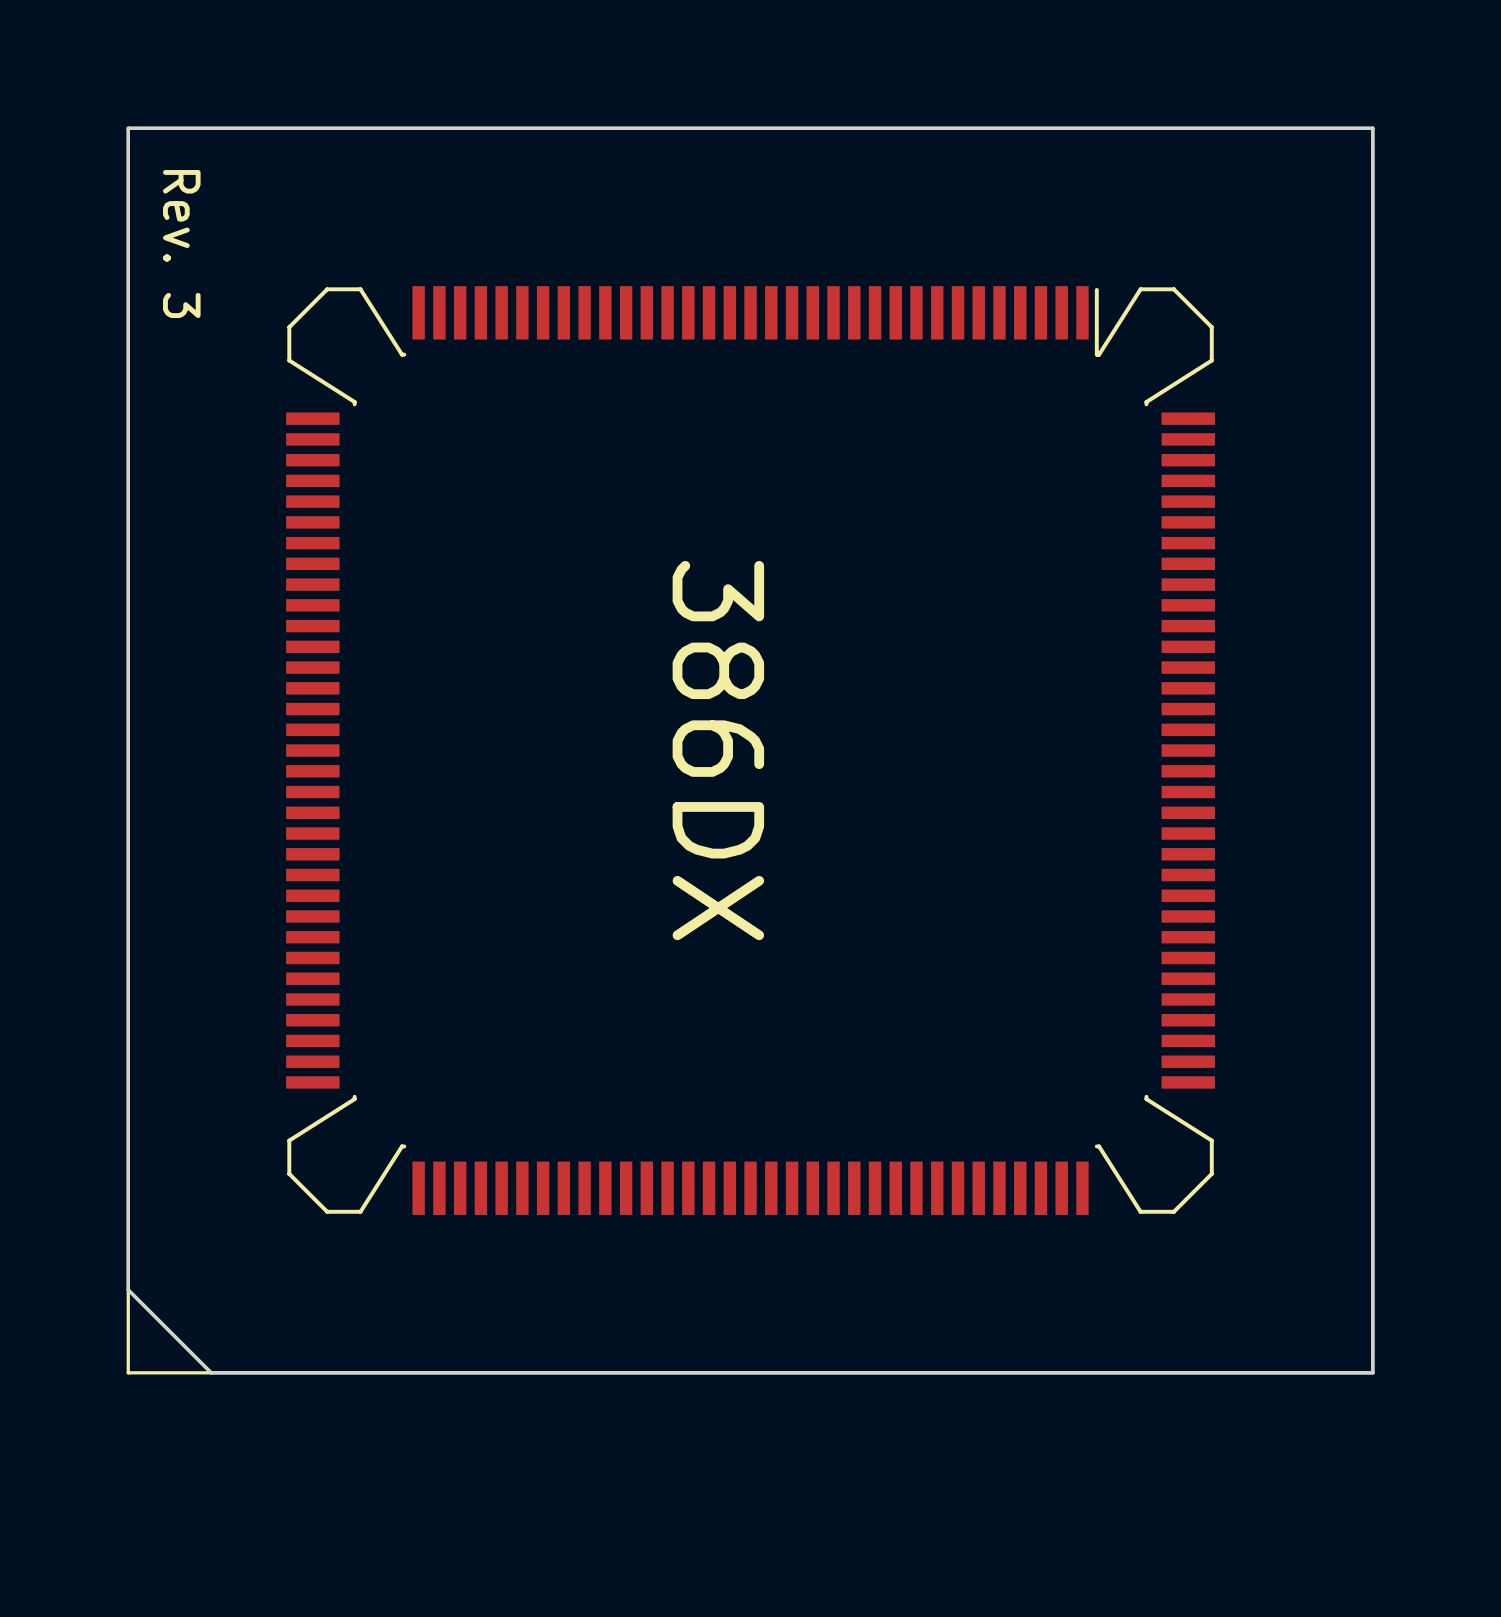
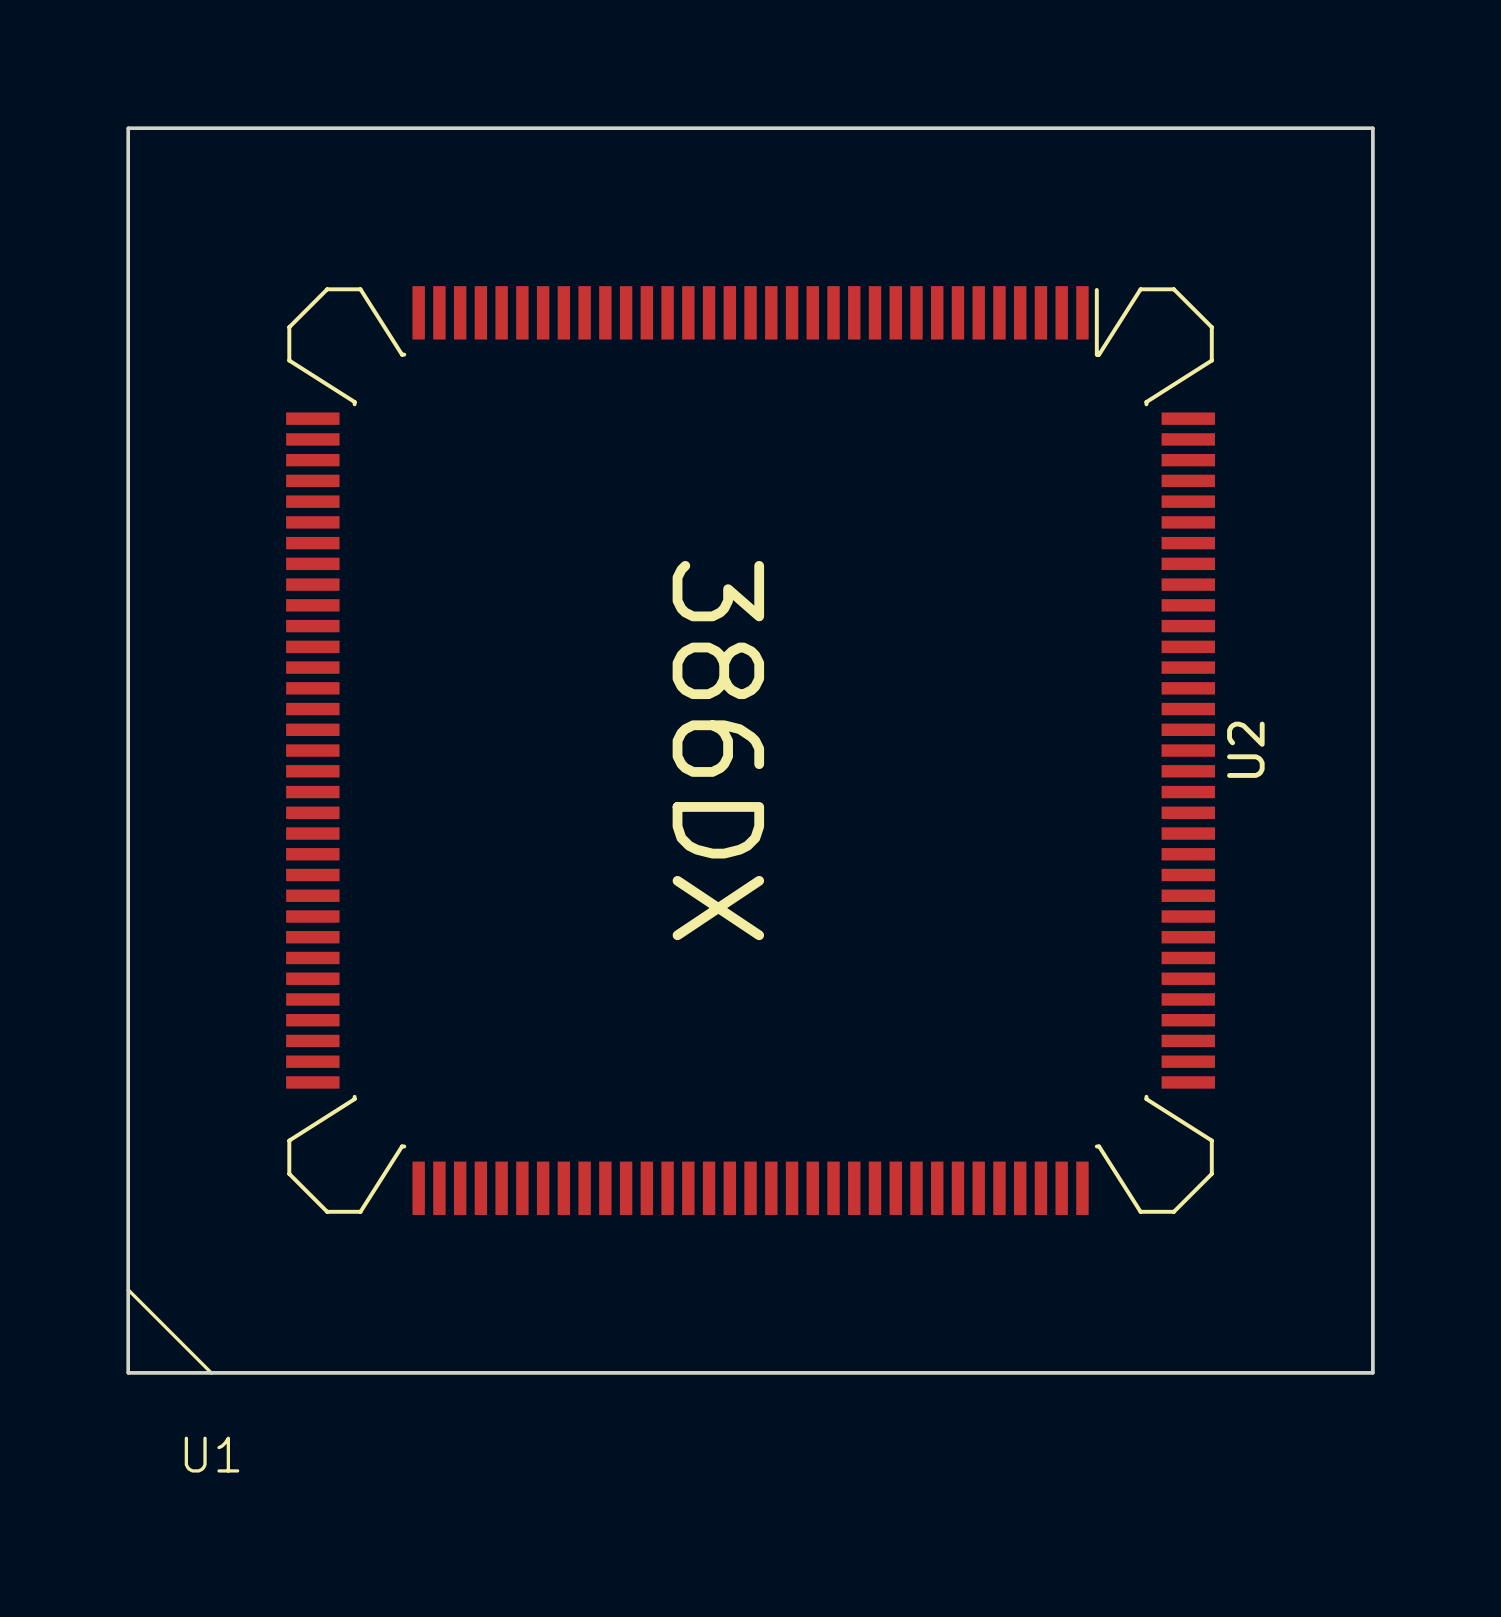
text: Rev. 3 (181, 244) -> none
U2 name: none -> U2 (1245, 749)
board edge: (128, 1289) (211, 1372) -> (128, 1289) (128, 1372) (211, 1372)
U1 name: none -> U1 (212, 1454)

